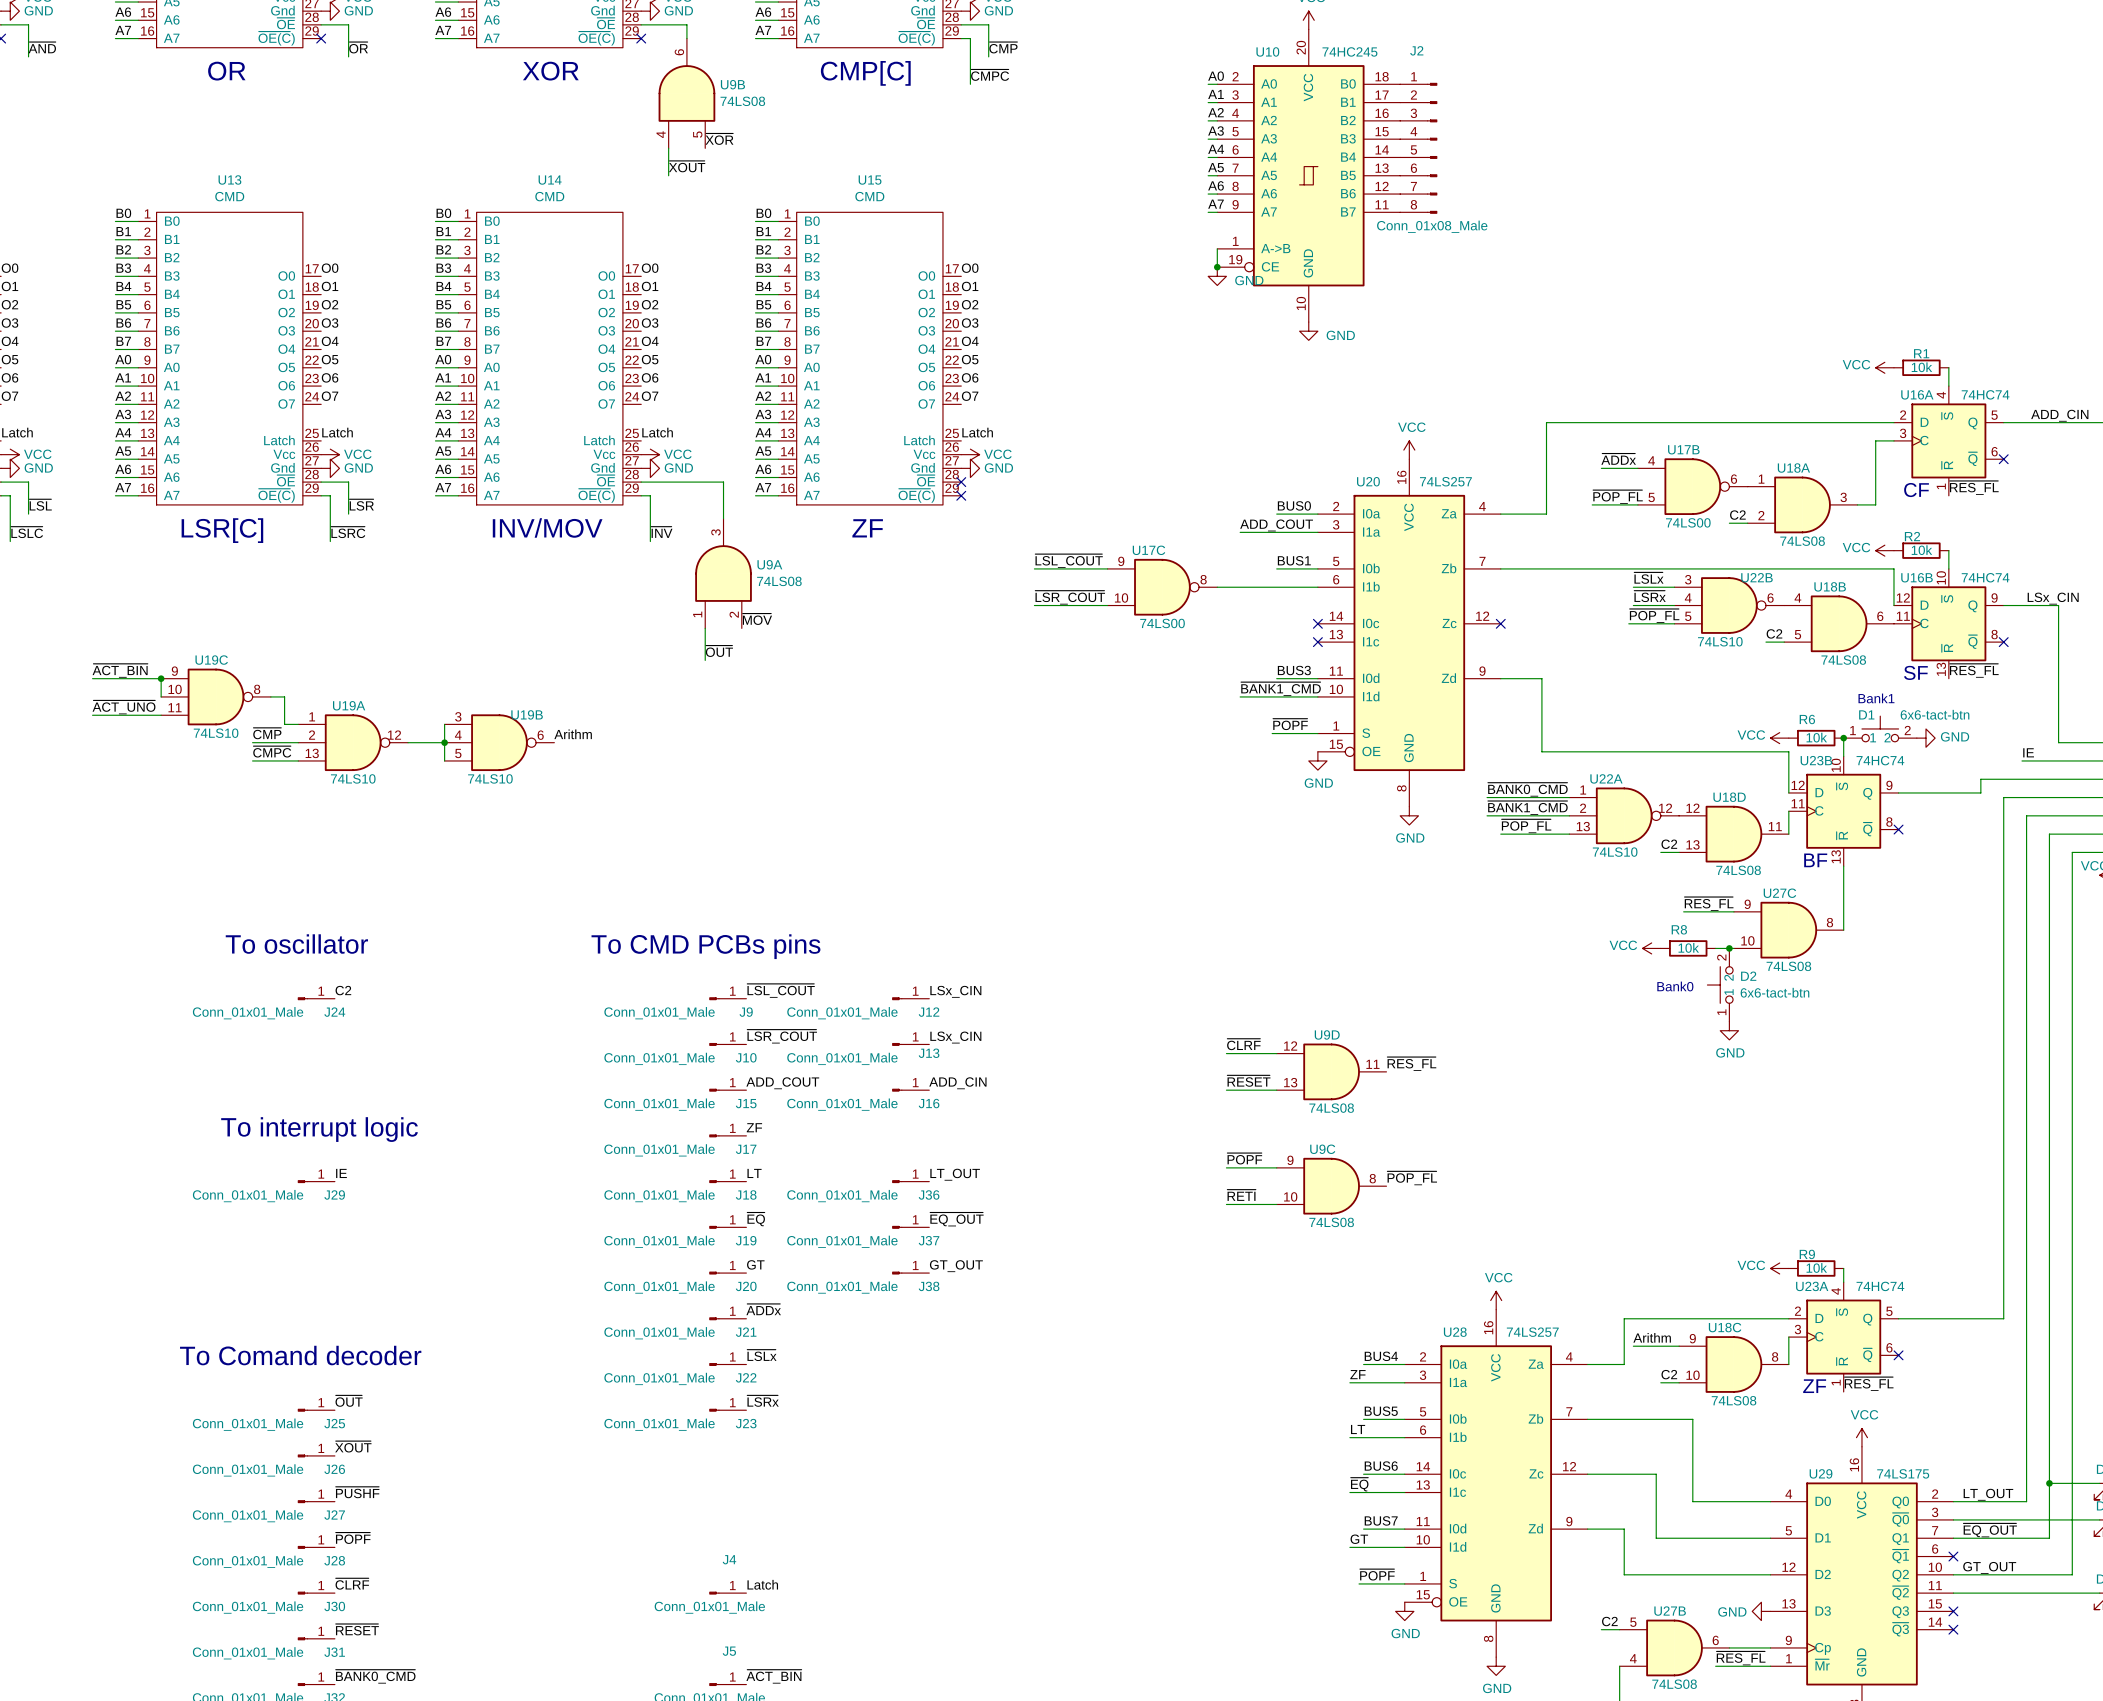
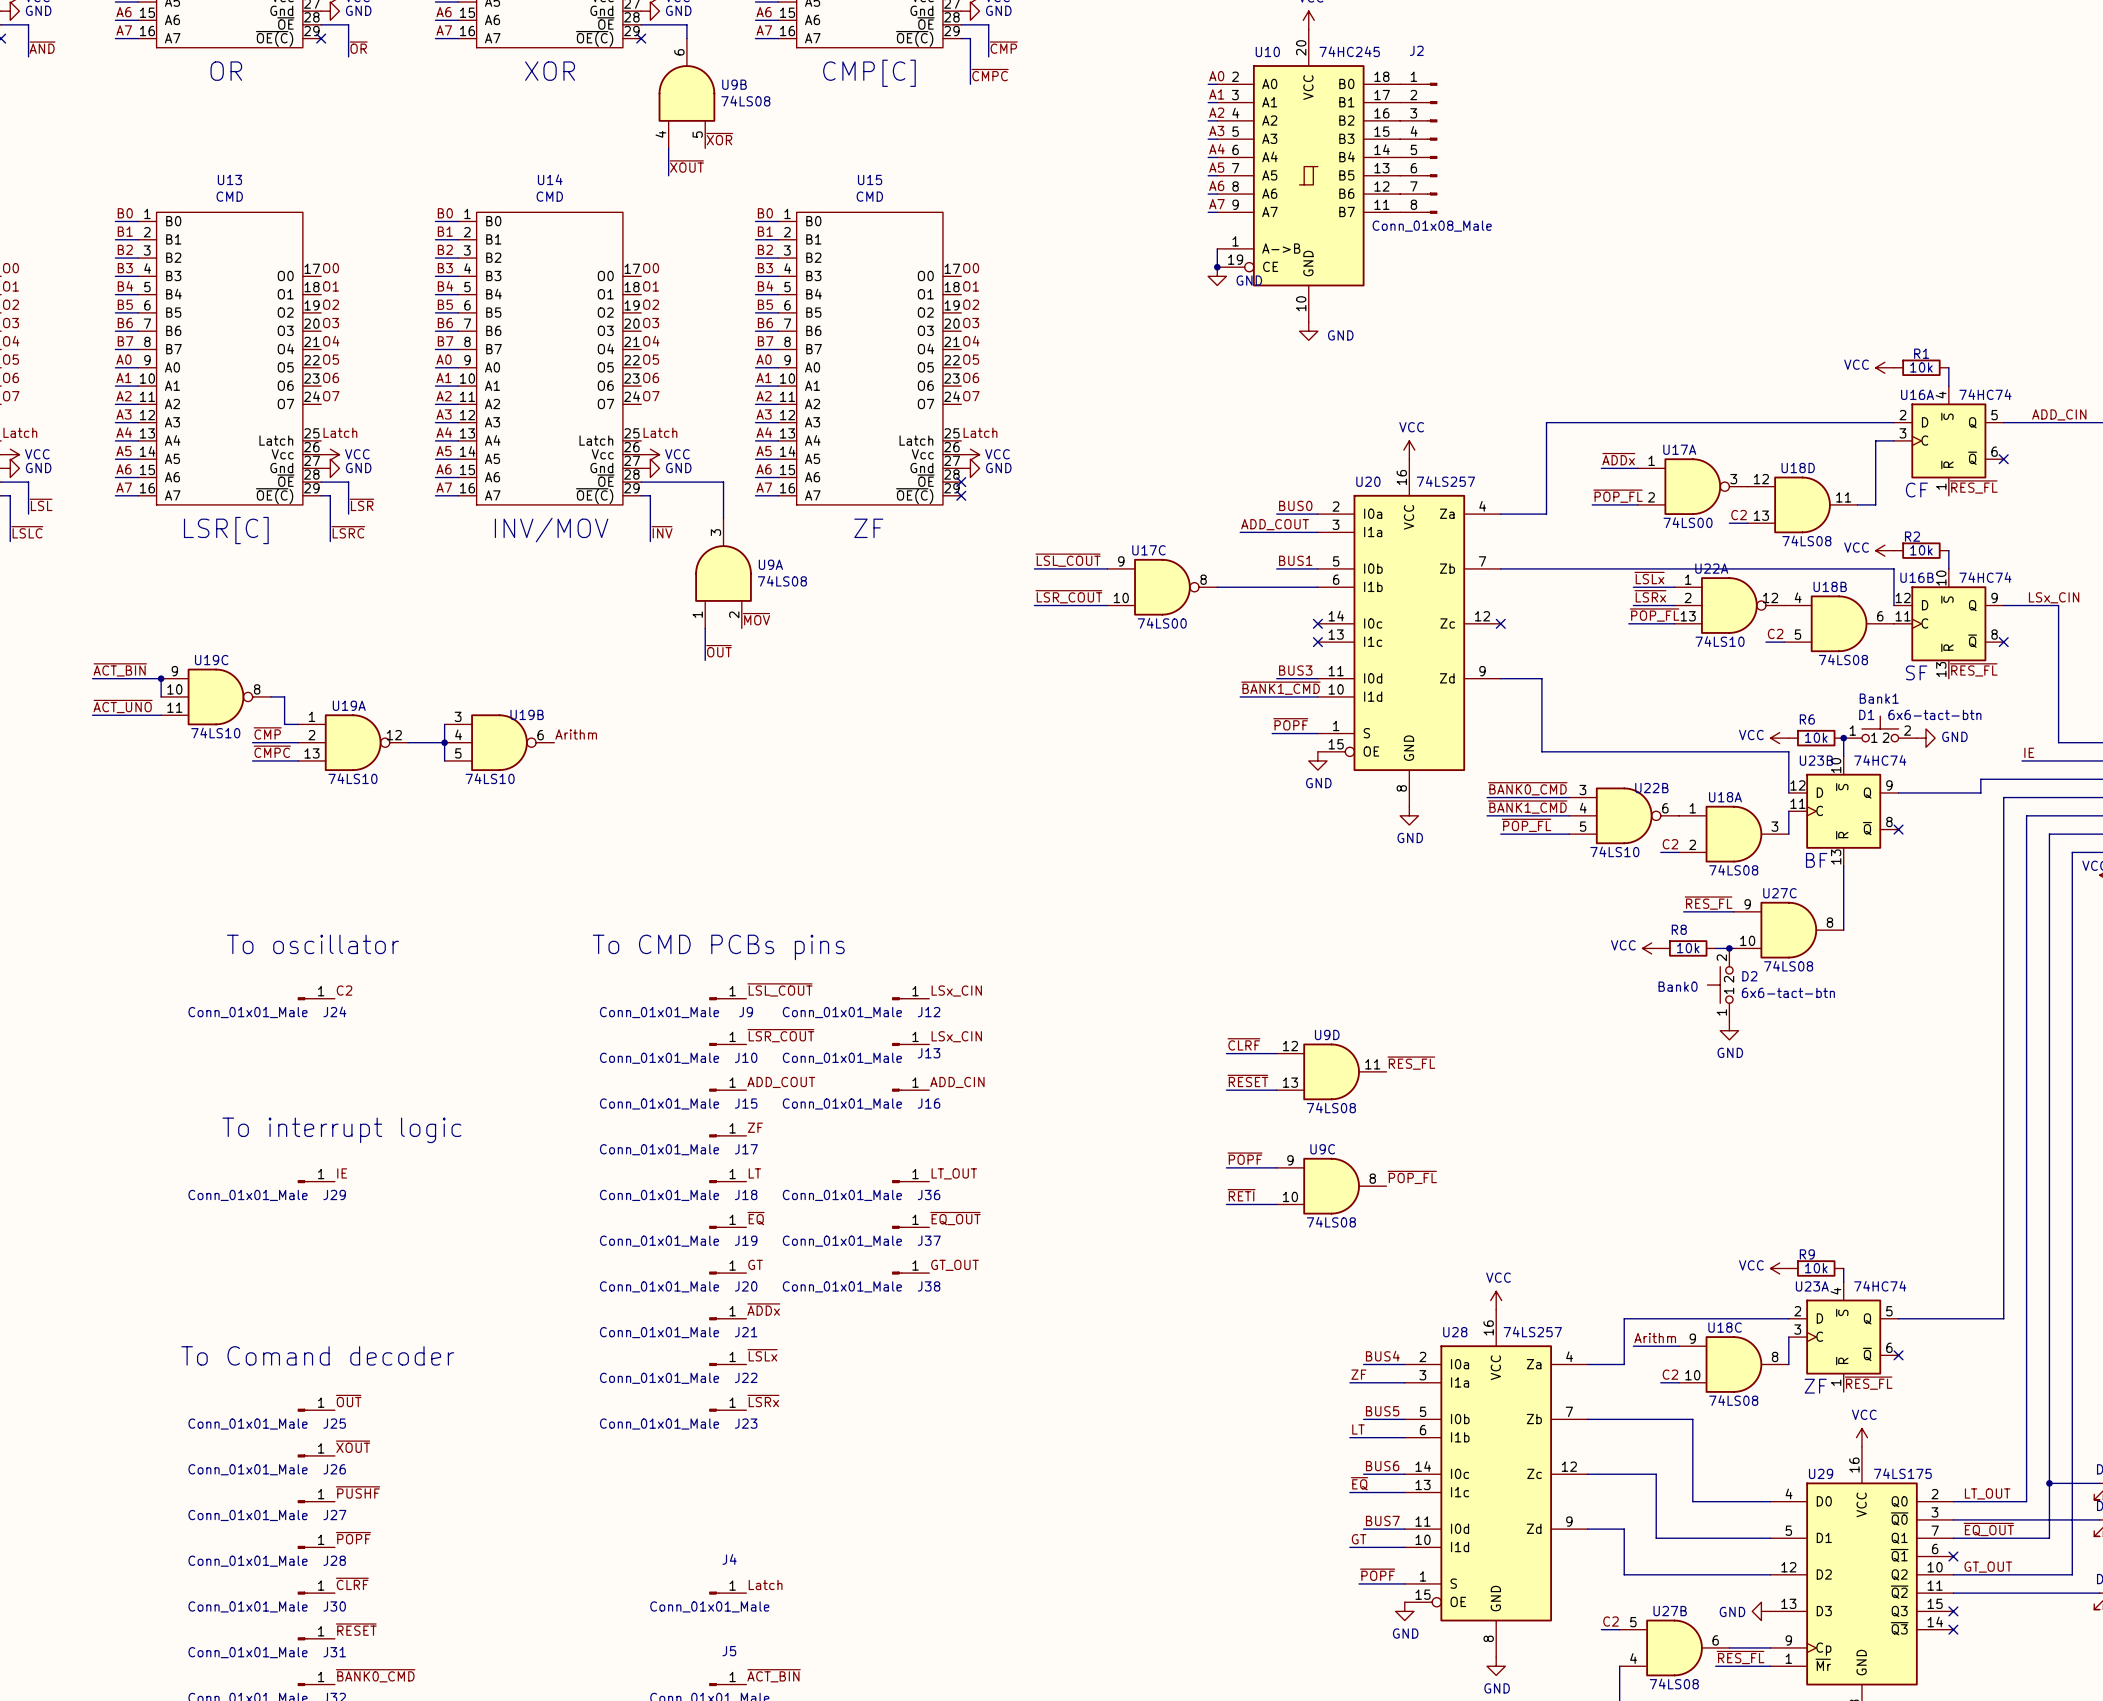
U17B name: U17B (1683, 449) -> U17A (1679, 449)
U17B pin number: 4 (1651, 460) -> 1 (1651, 460)
U17B pin number: 6 (1734, 479) -> 3 (1733, 479)
U17B pin number: 5 (1651, 497) -> 2 (1651, 497)
U18A position: (1802, 504) -> (1733, 834)
U22B position: (1729, 605) -> (1624, 815)
U22A position: (1624, 815) -> (1729, 605)
U18D position: (1733, 834) -> (1802, 504)

